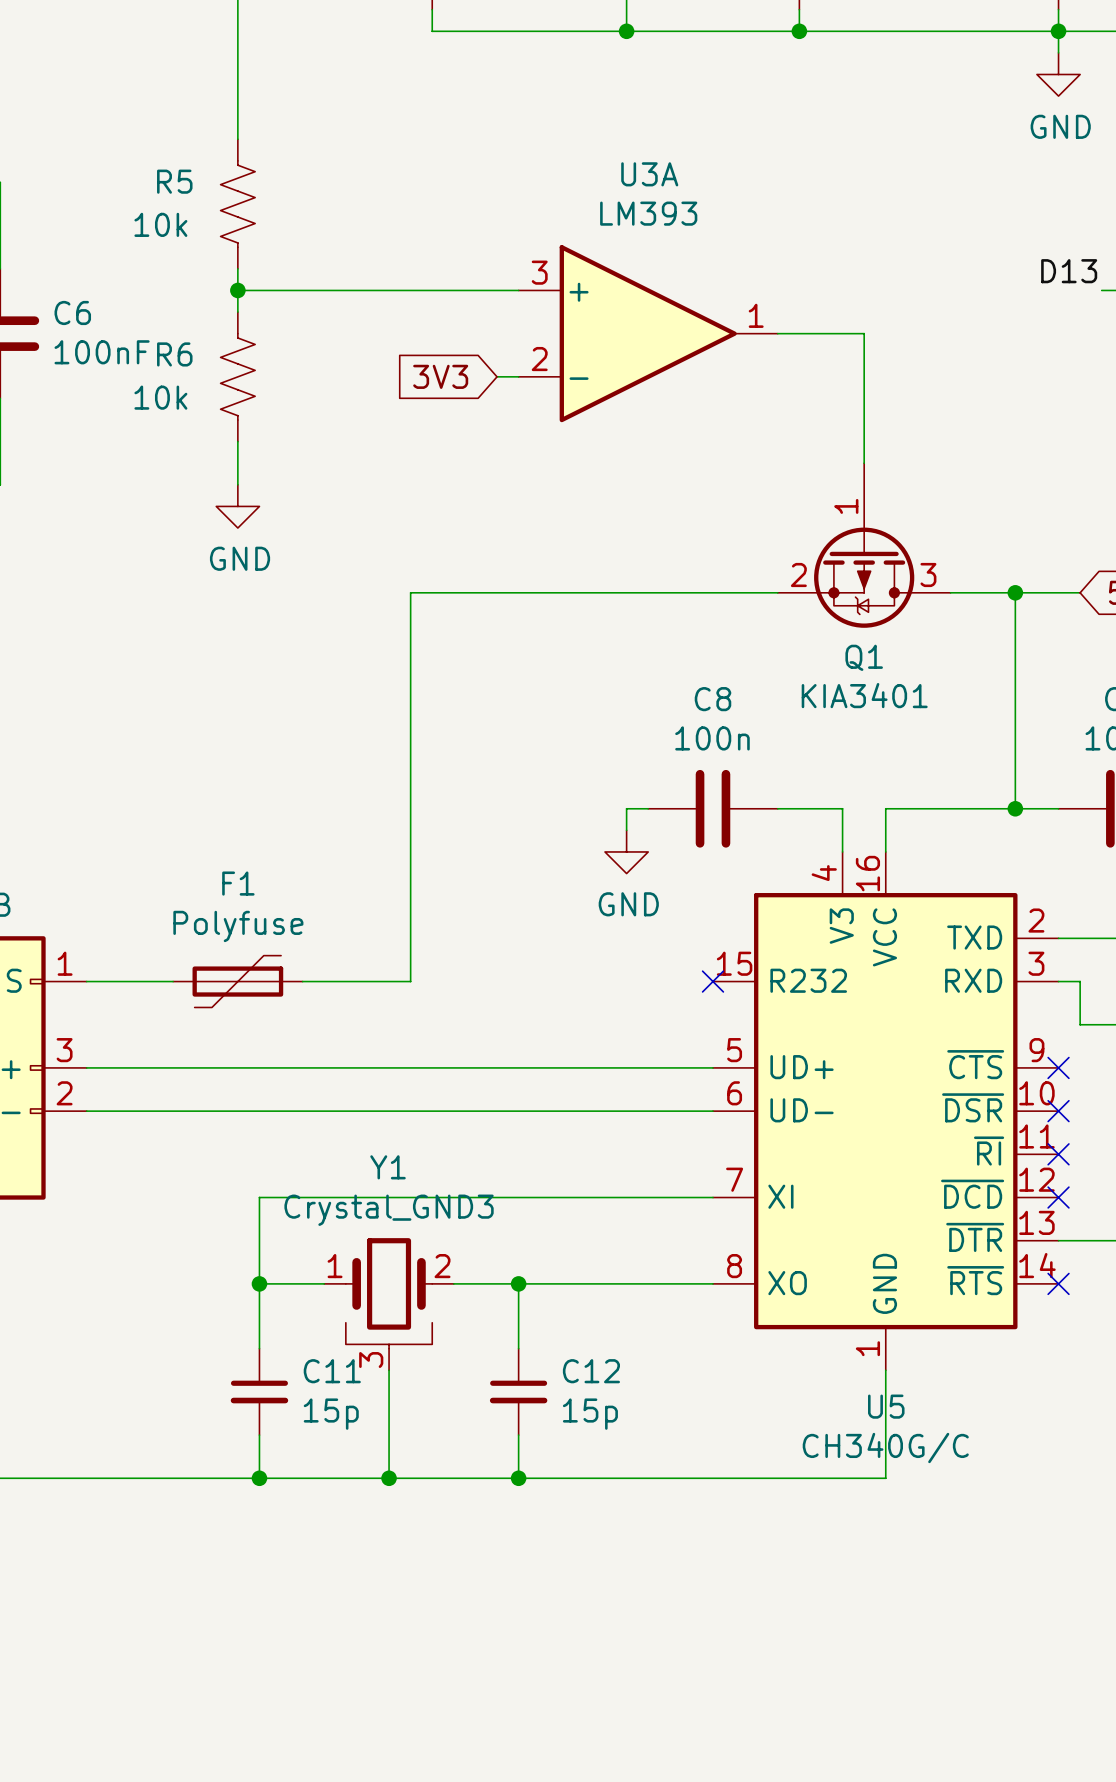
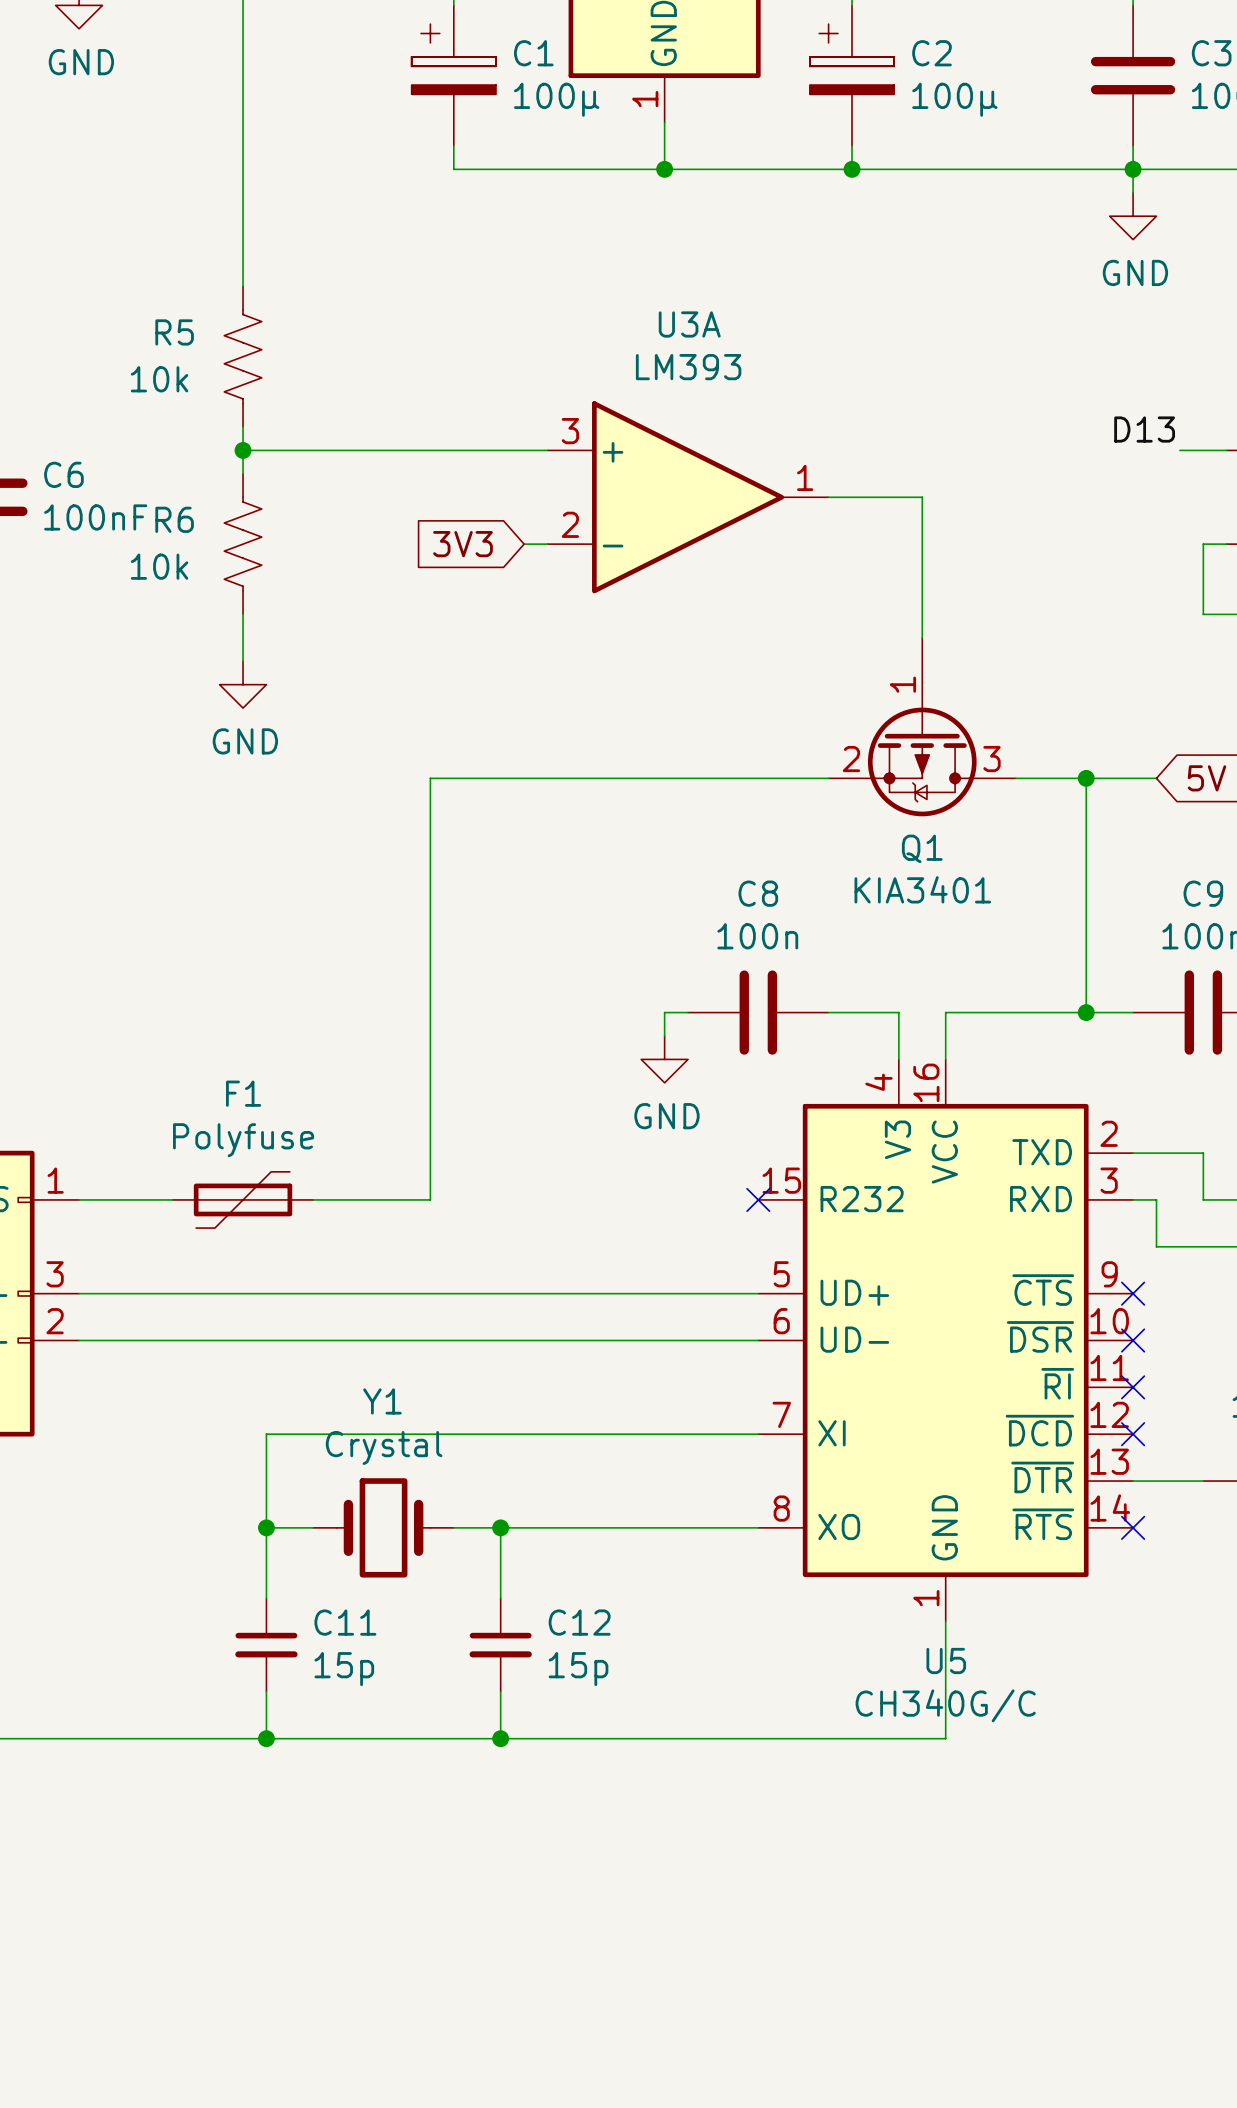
Y1 value: Crystal_GND3 (389, 1210) -> Crystal (384, 1447)
Y1 symbol: [324, 1238, 454, 1371] -> [313, 1478, 454, 1578]
wire: (518, 1283) (518, 1348) -> (500, 1527) (500, 1598)
junction position: (518, 1283) -> (500, 1527)
wire: (389, 1370) (389, 1478) -> none
C12 position: (518, 1391) -> (500, 1644)
wire: (518, 1435) (518, 1478) -> (500, 1691) (500, 1738)
junction: (389, 1478) -> none
junction: none -> (500, 1738)
junction: (518, 1478) -> none

